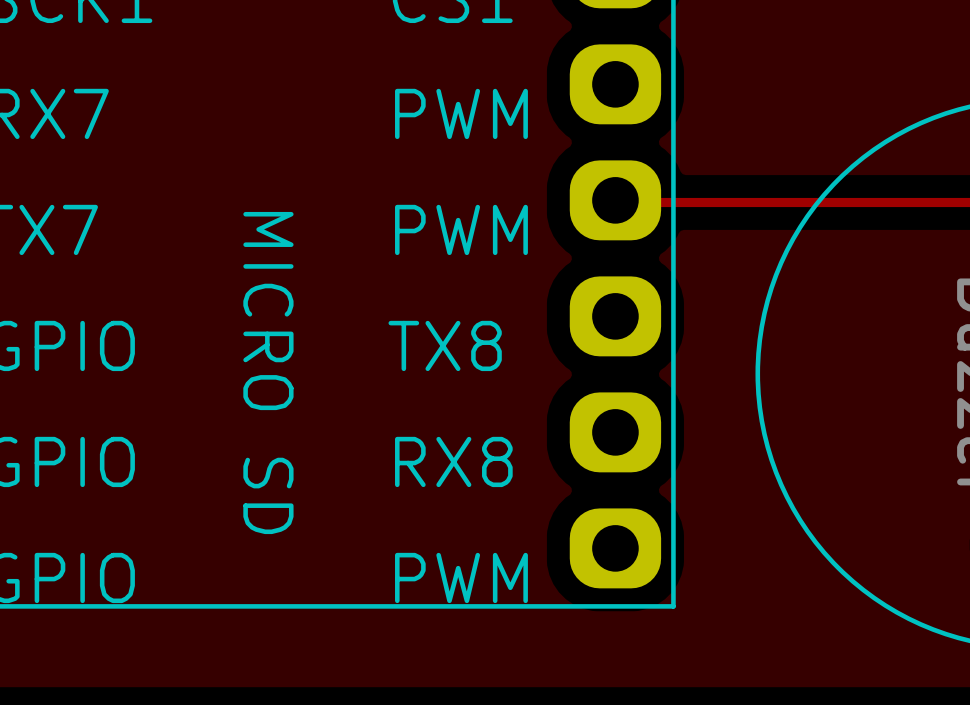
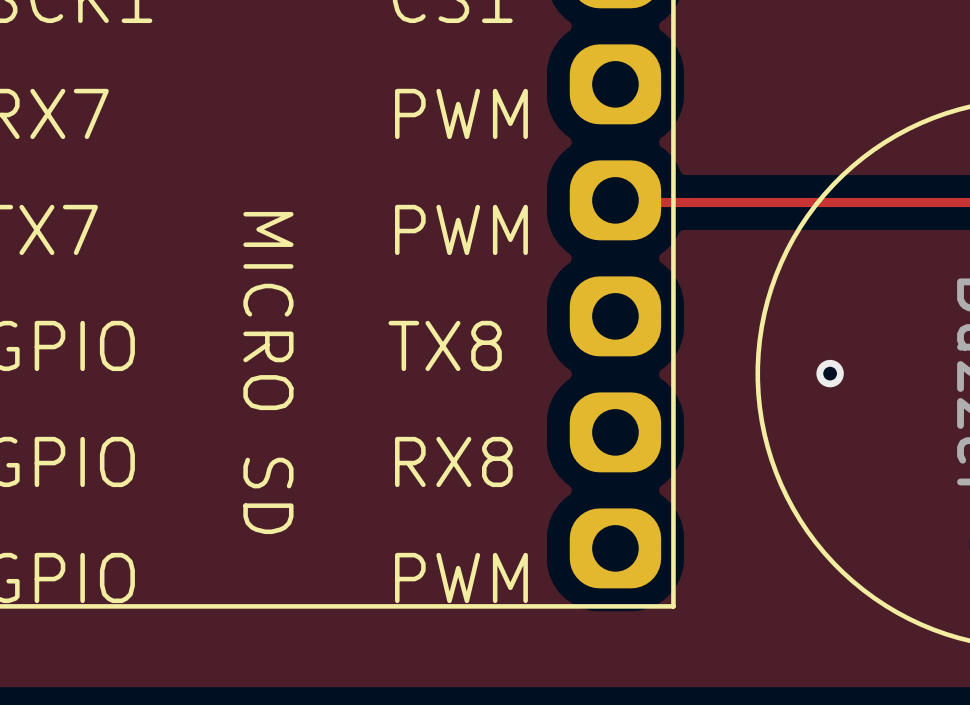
via: none -> (830, 373)

